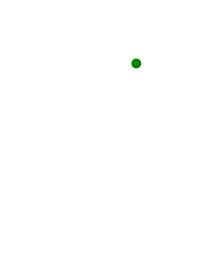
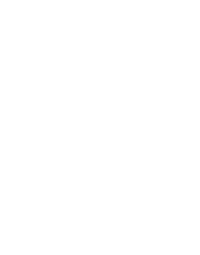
junction: (136, 63) -> none

